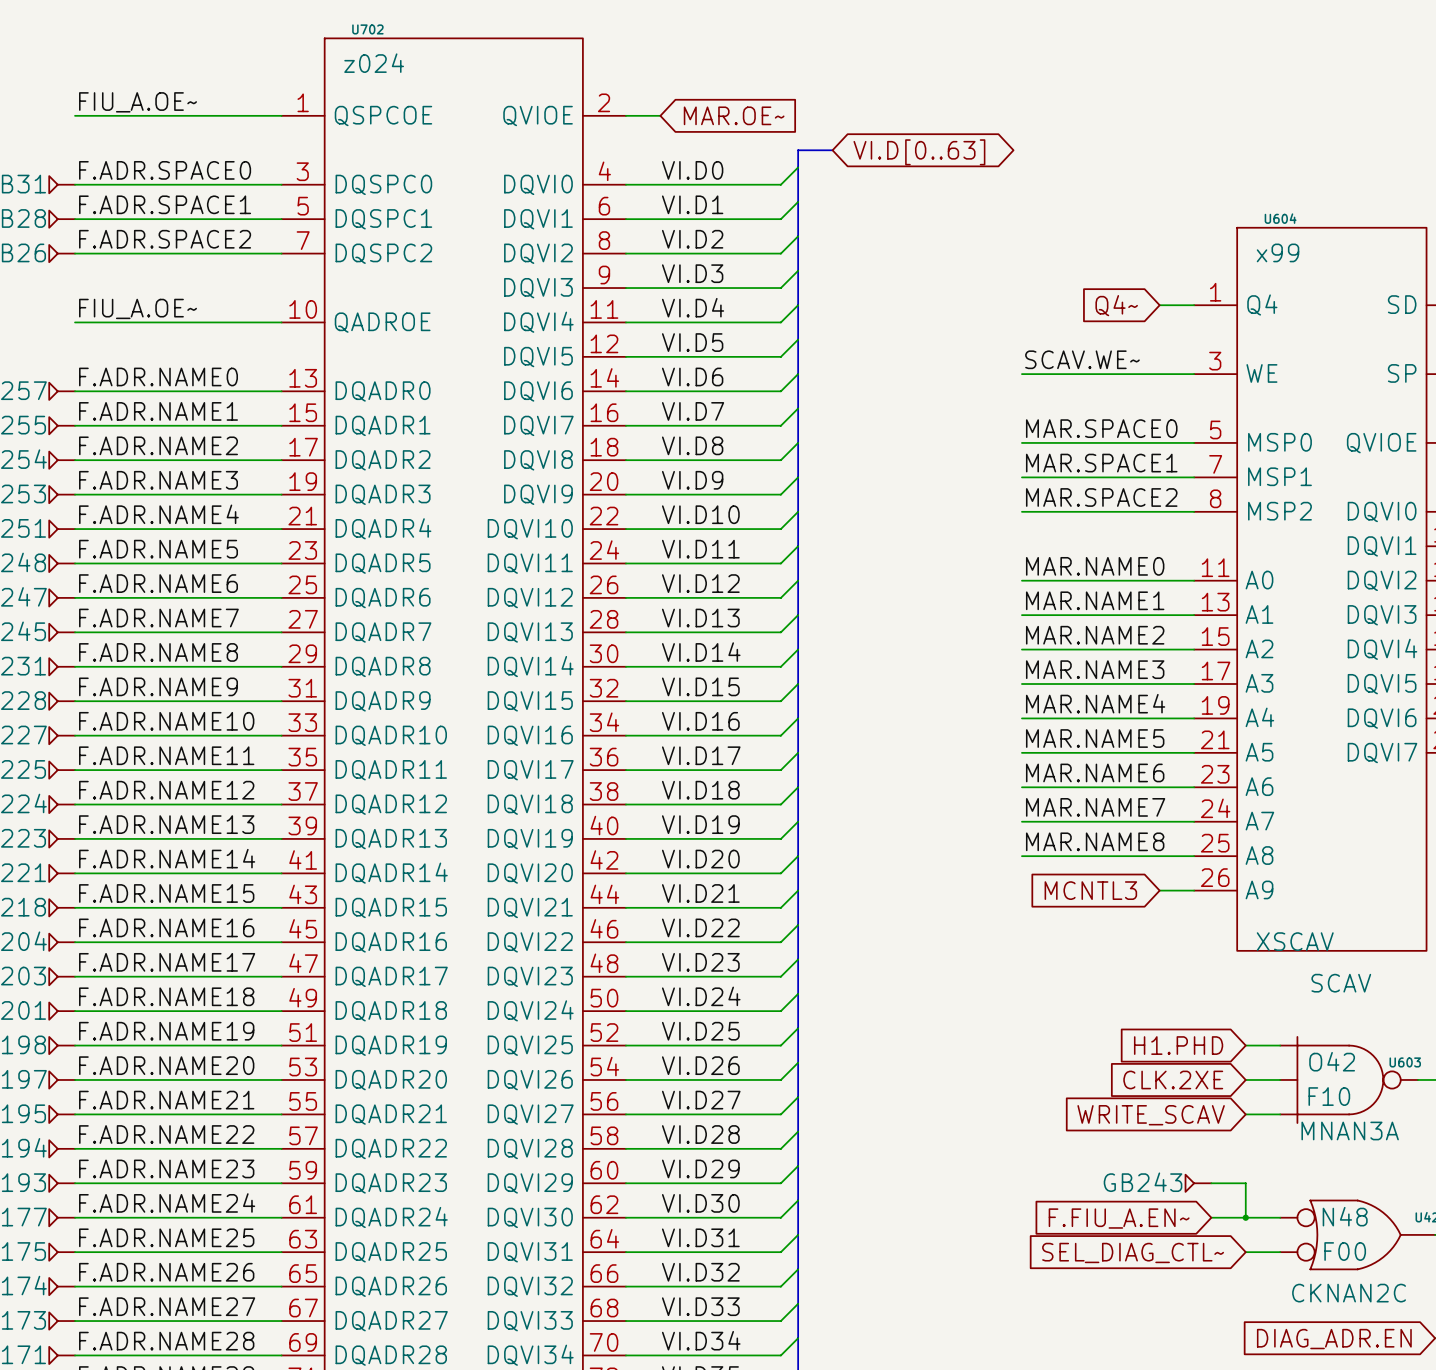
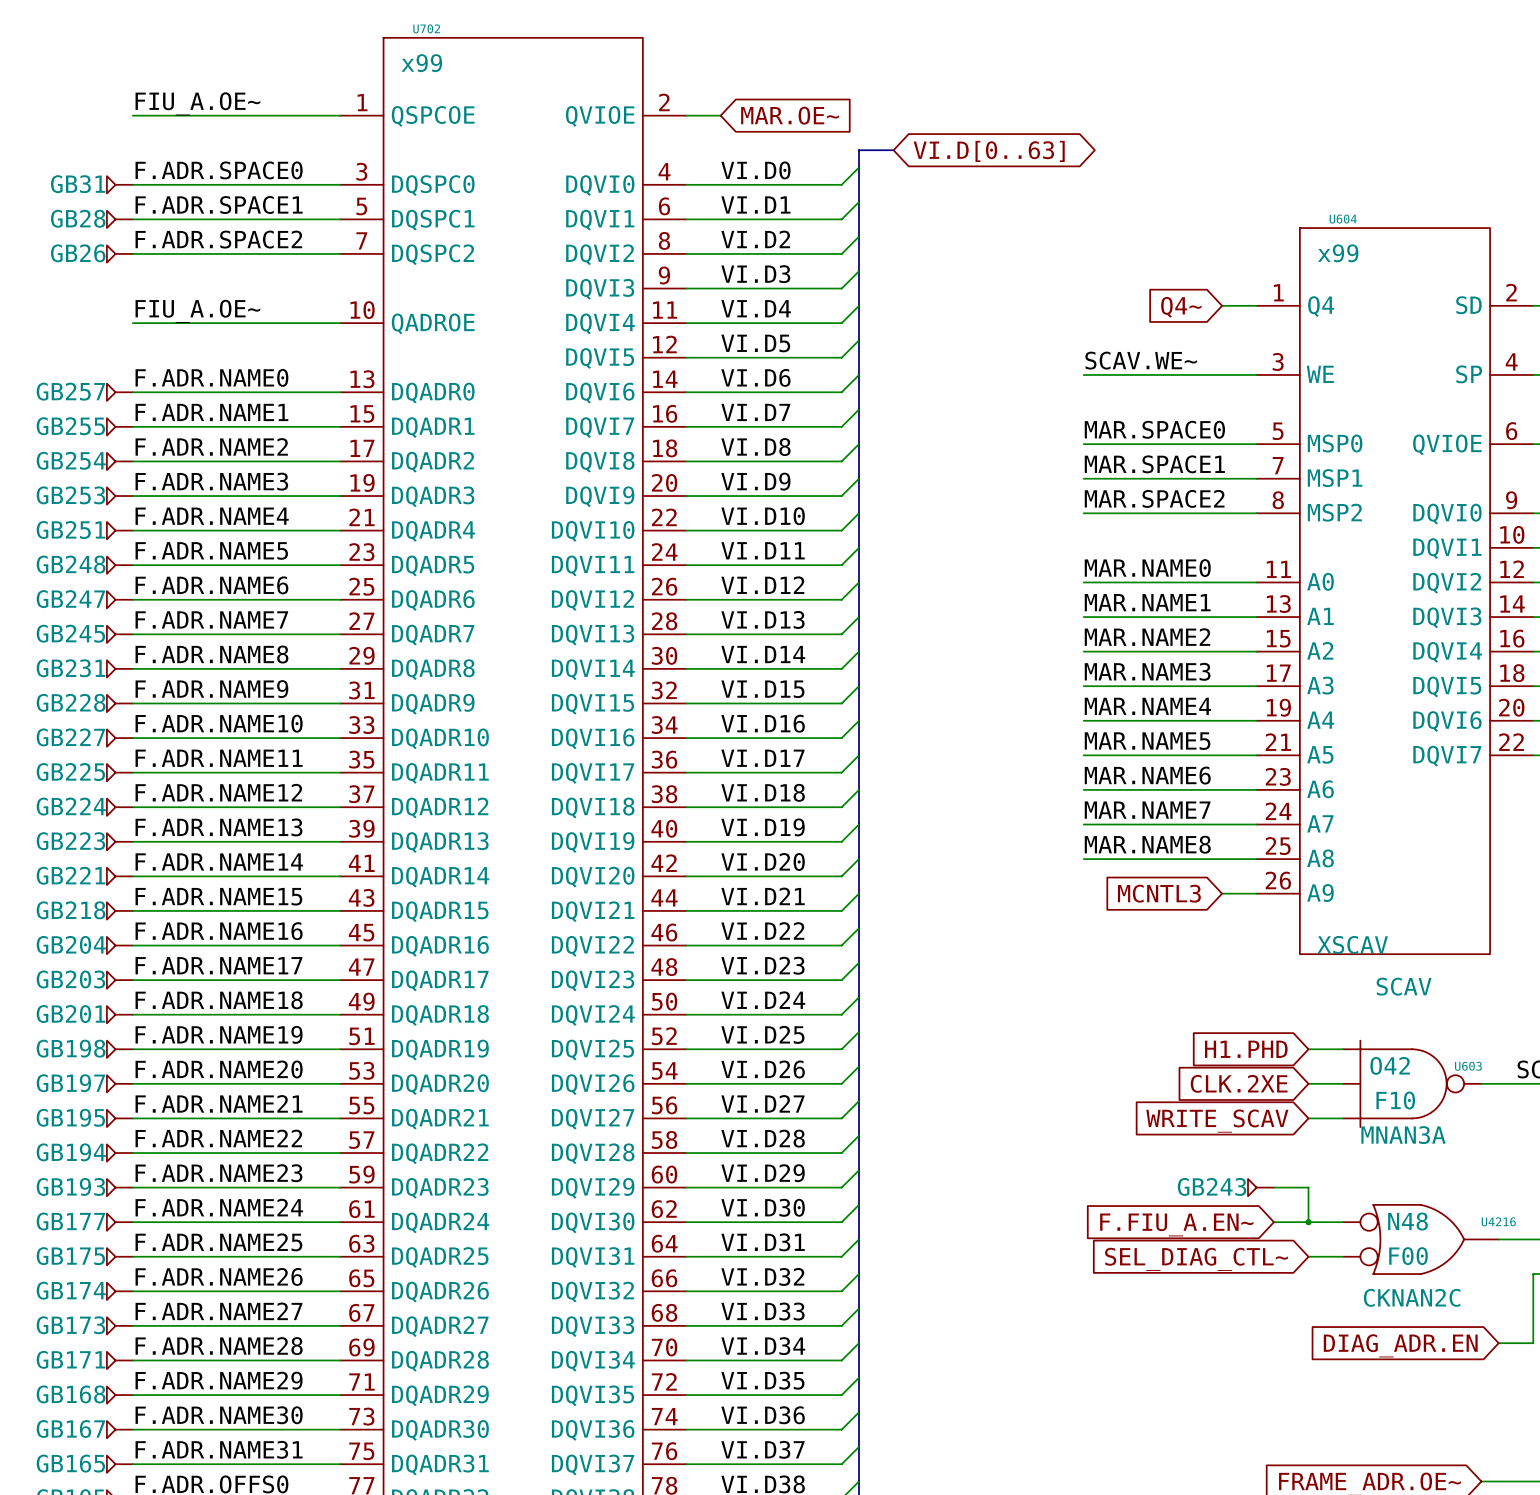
U702 text: z024 (374, 63) -> x99 (421, 63)

